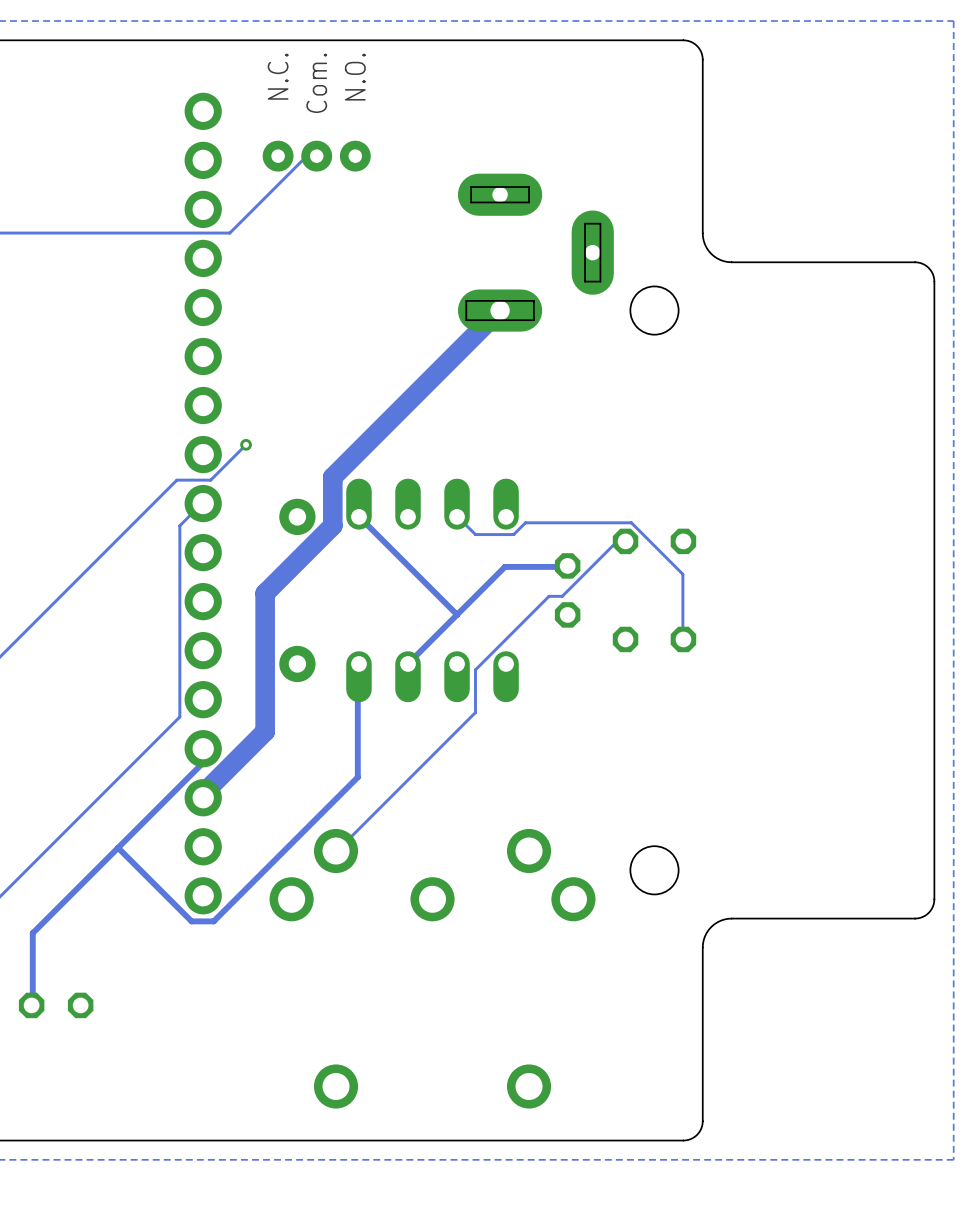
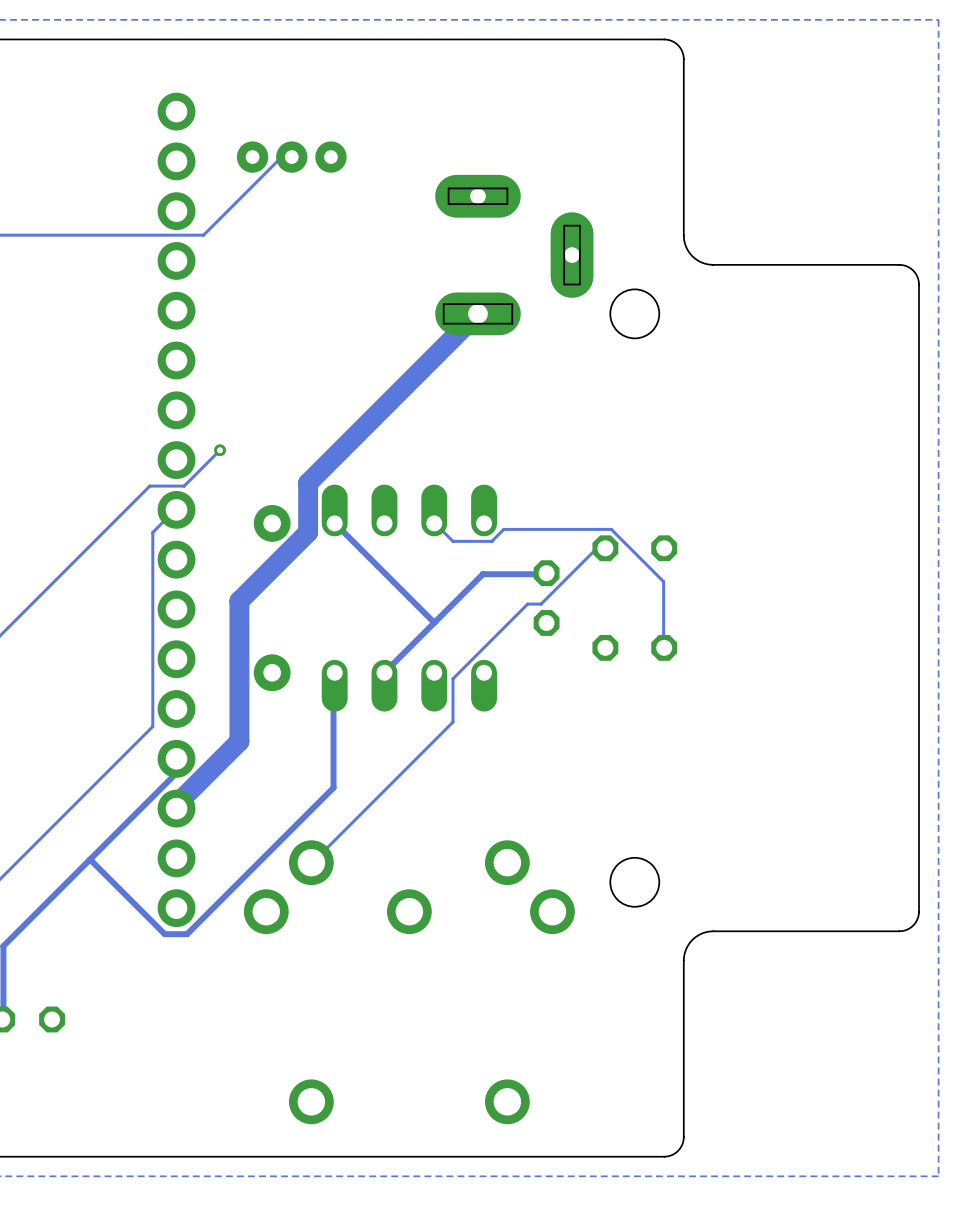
text: N.C. (278, 76) -> none
text: N.O. (355, 77) -> none
text: Com. (316, 83) -> none

